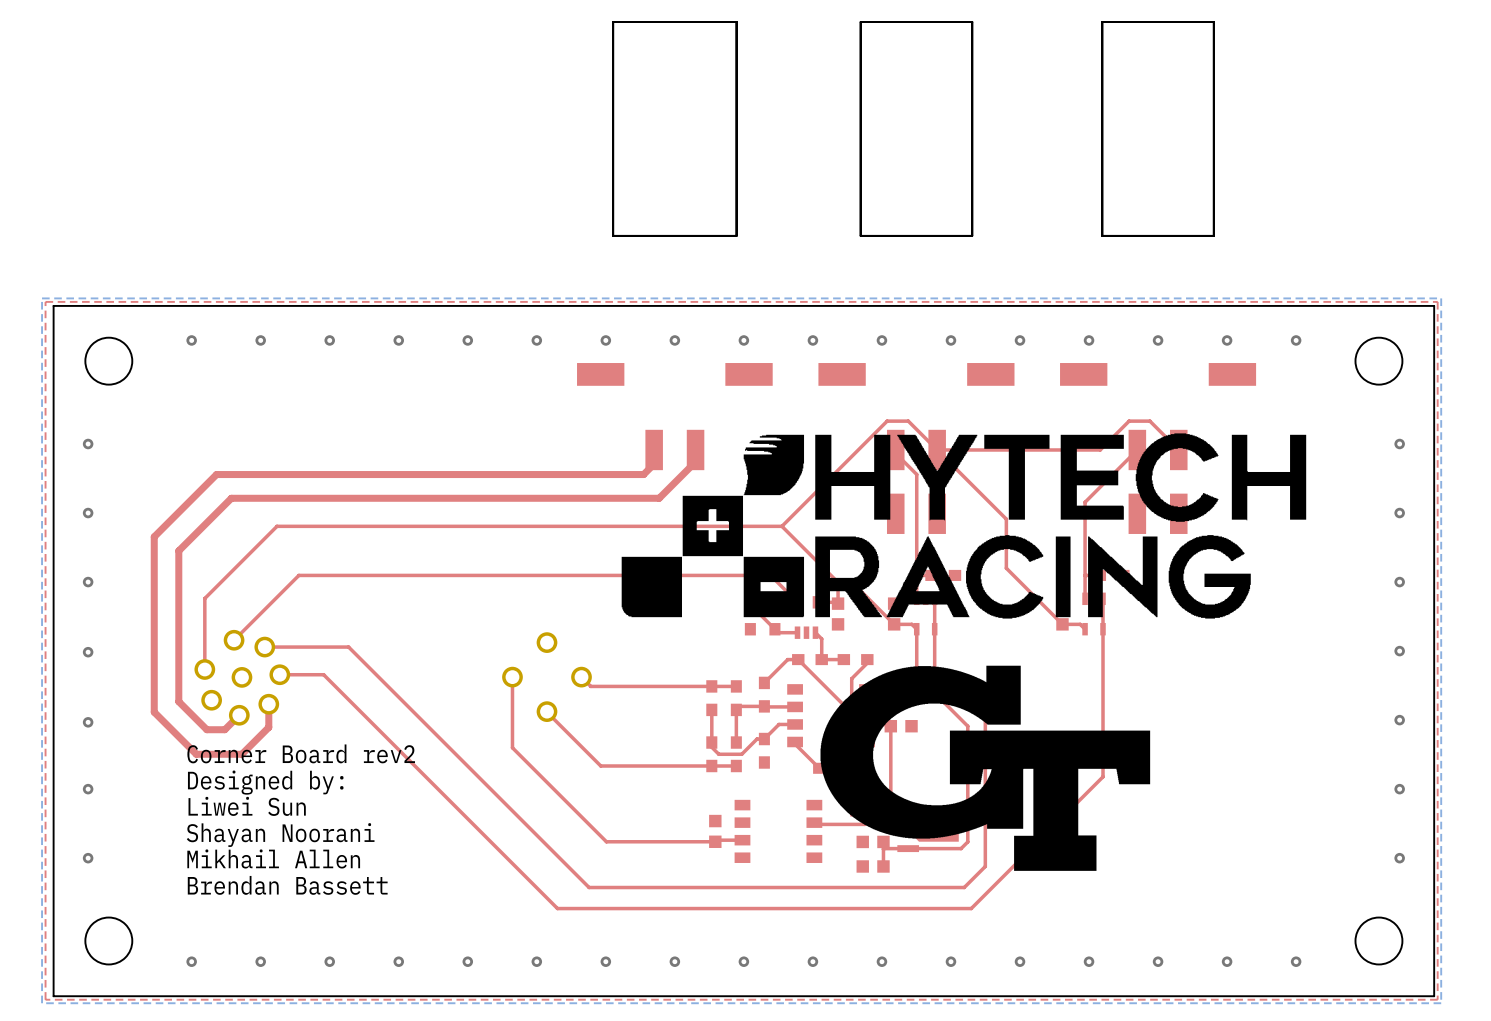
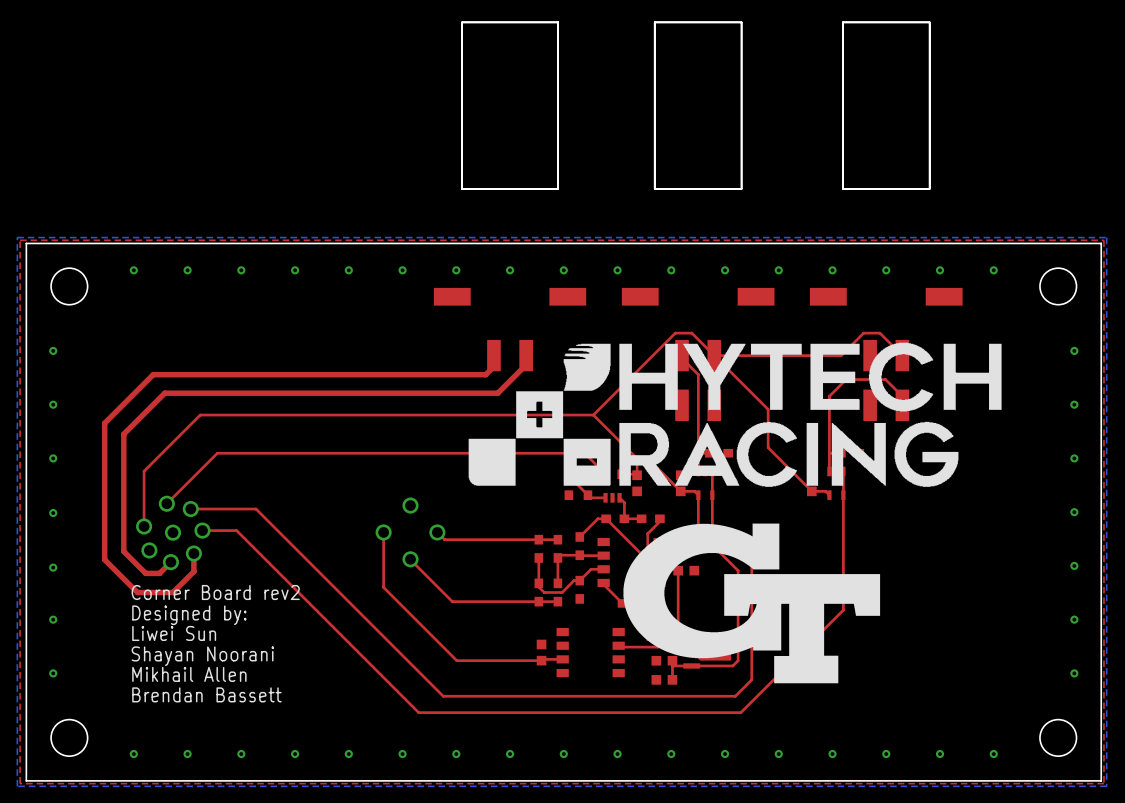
top track: (1137, 449) (1106, 480) -> (902, 405) (902, 396) (885, 379) (846, 379)

